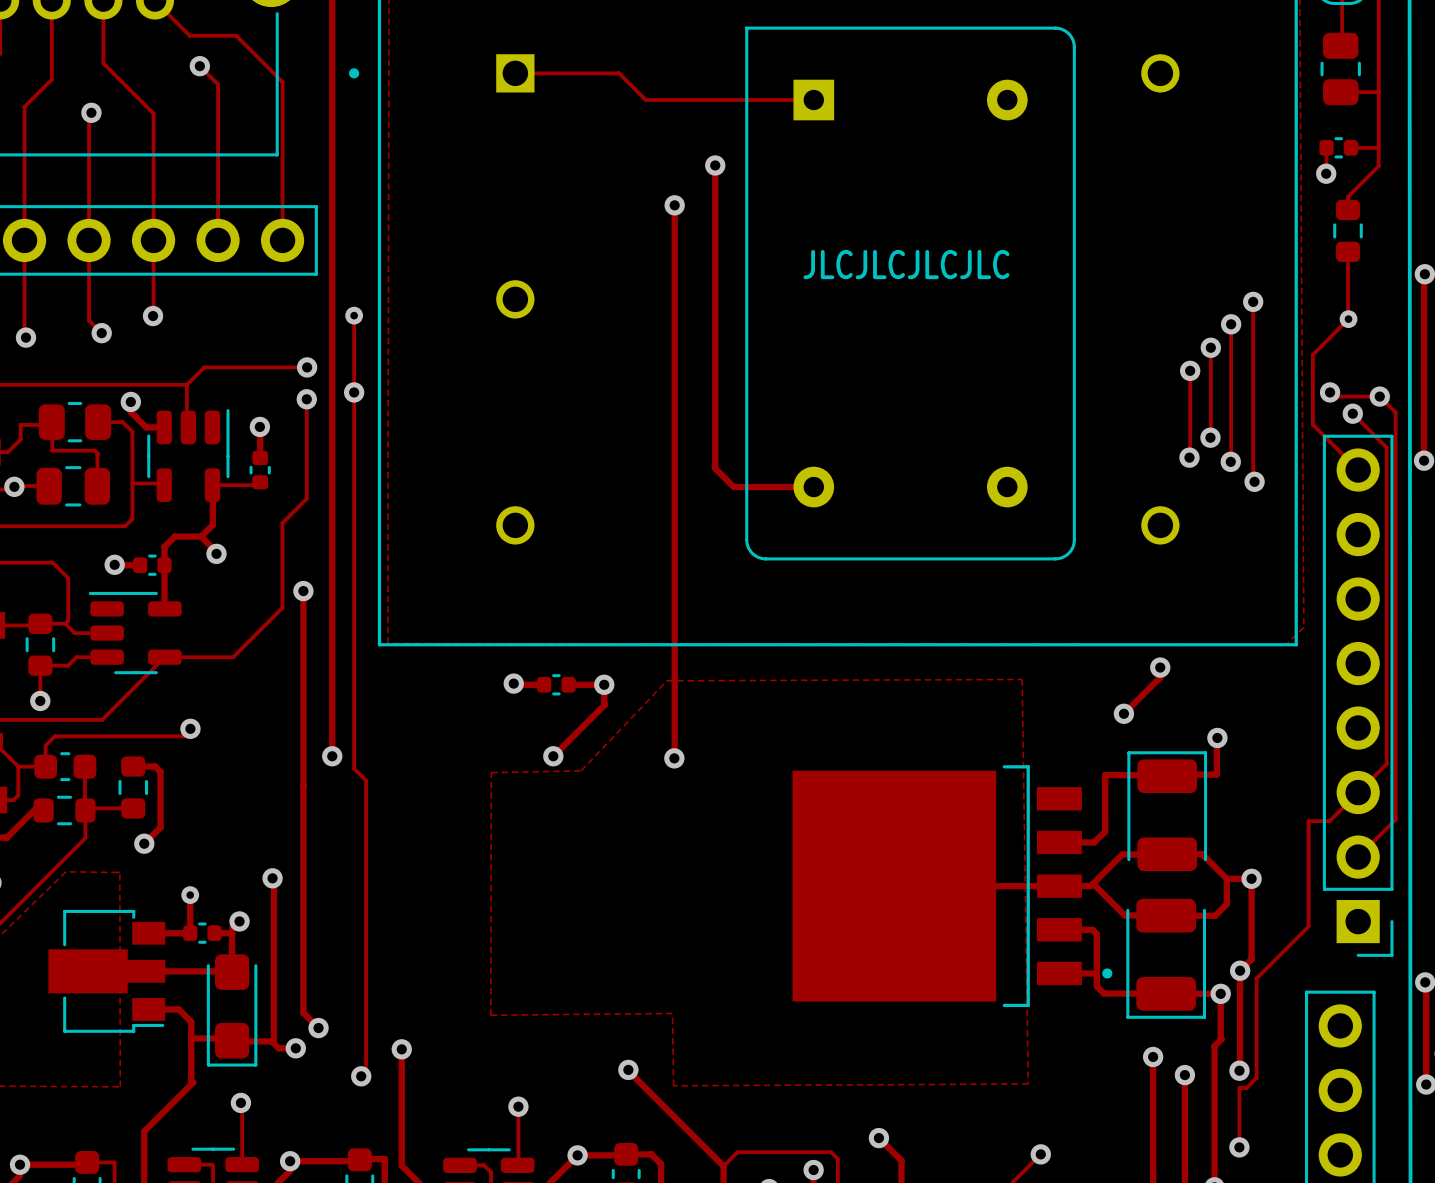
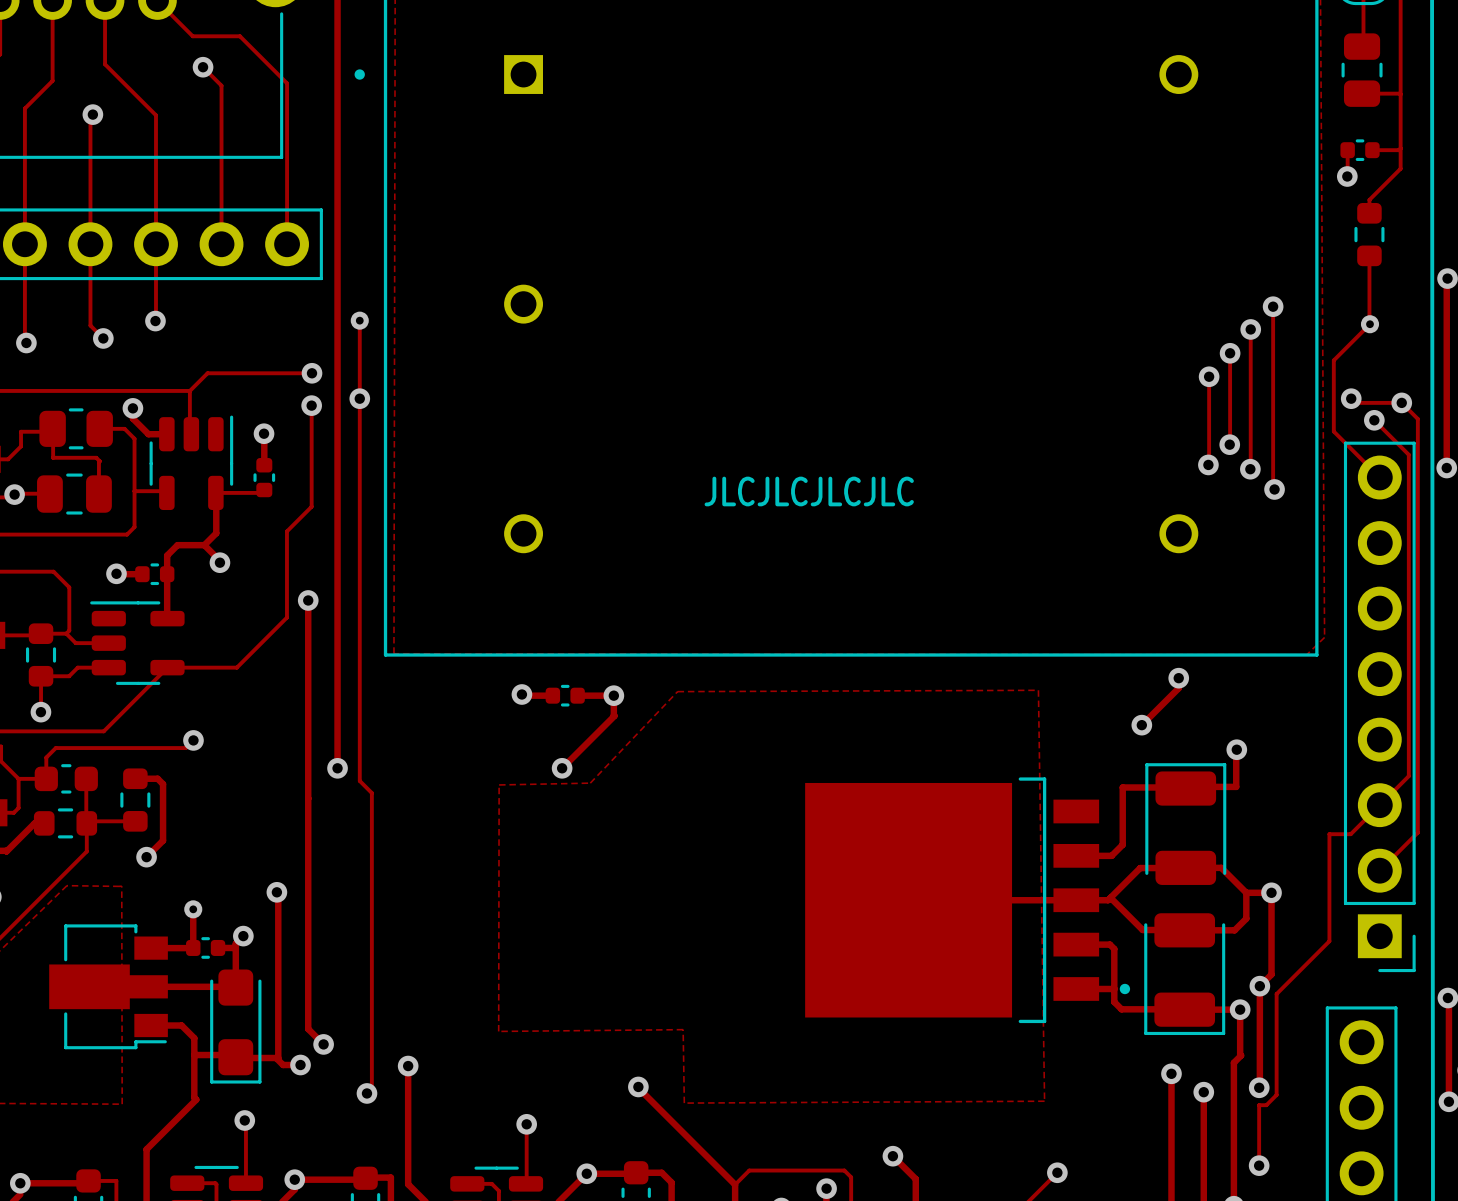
track: (515, 73) (618, 72) (645, 100) (813, 100) -> none
track: (715, 165) (715, 468) (733, 487) (813, 487) -> none
via: (715, 165) -> none
track: (674, 205) (674, 758) -> none
via: (674, 205) -> none
text position: JLCJLCJLCJLC (906, 264) -> JLCJLCJLCJLC (809, 491)
part: (910, 293) -> none
via: (674, 758) -> none

